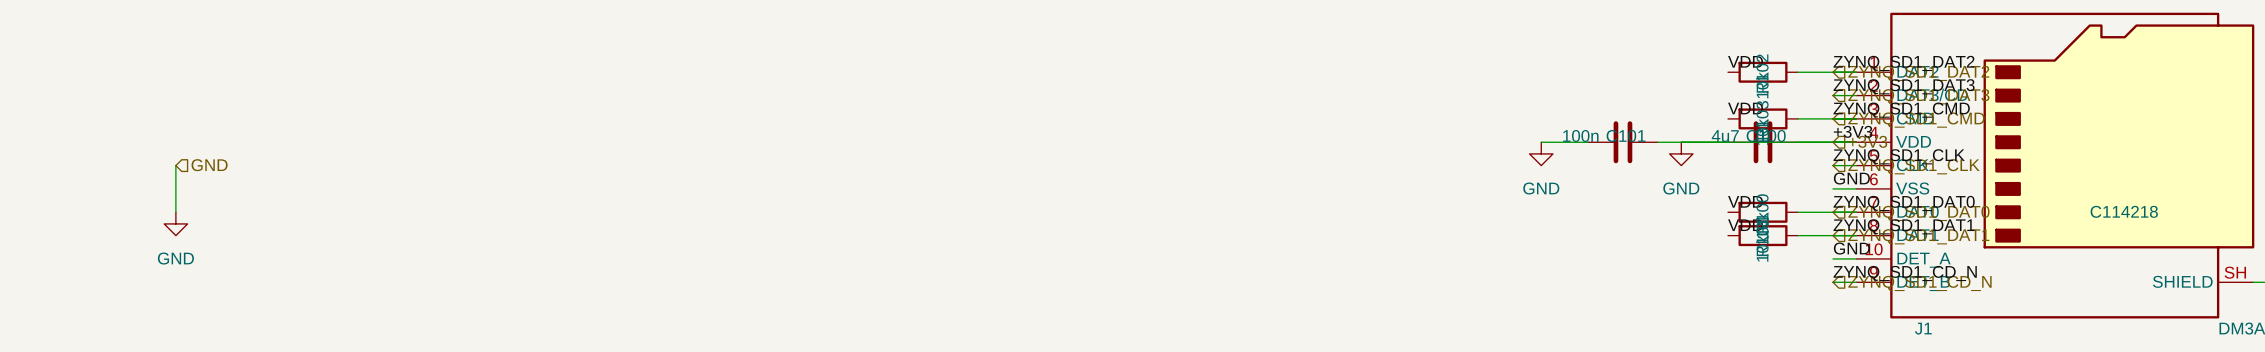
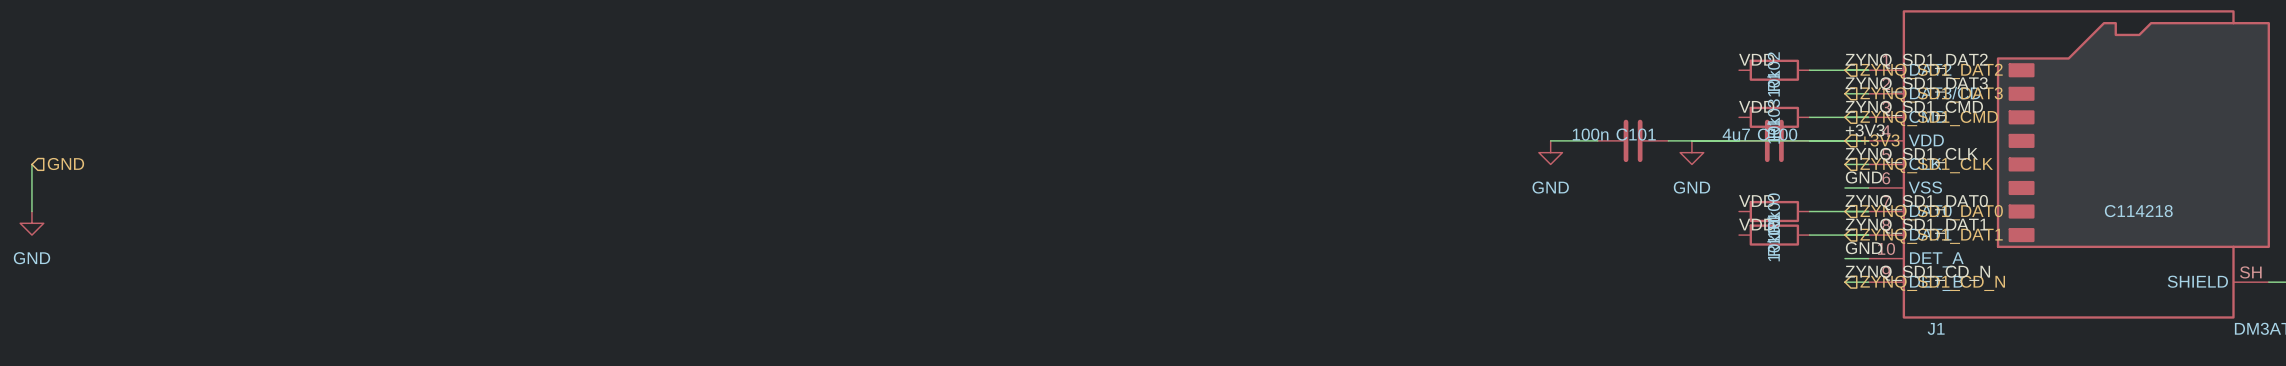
wire: (175, 165) (175, 212) -> (31, 164) (31, 211)
hierarchical label position: GND (209, 165) -> GND (65, 163)
power symbol position: GND (175, 223) -> GND (31, 223)

